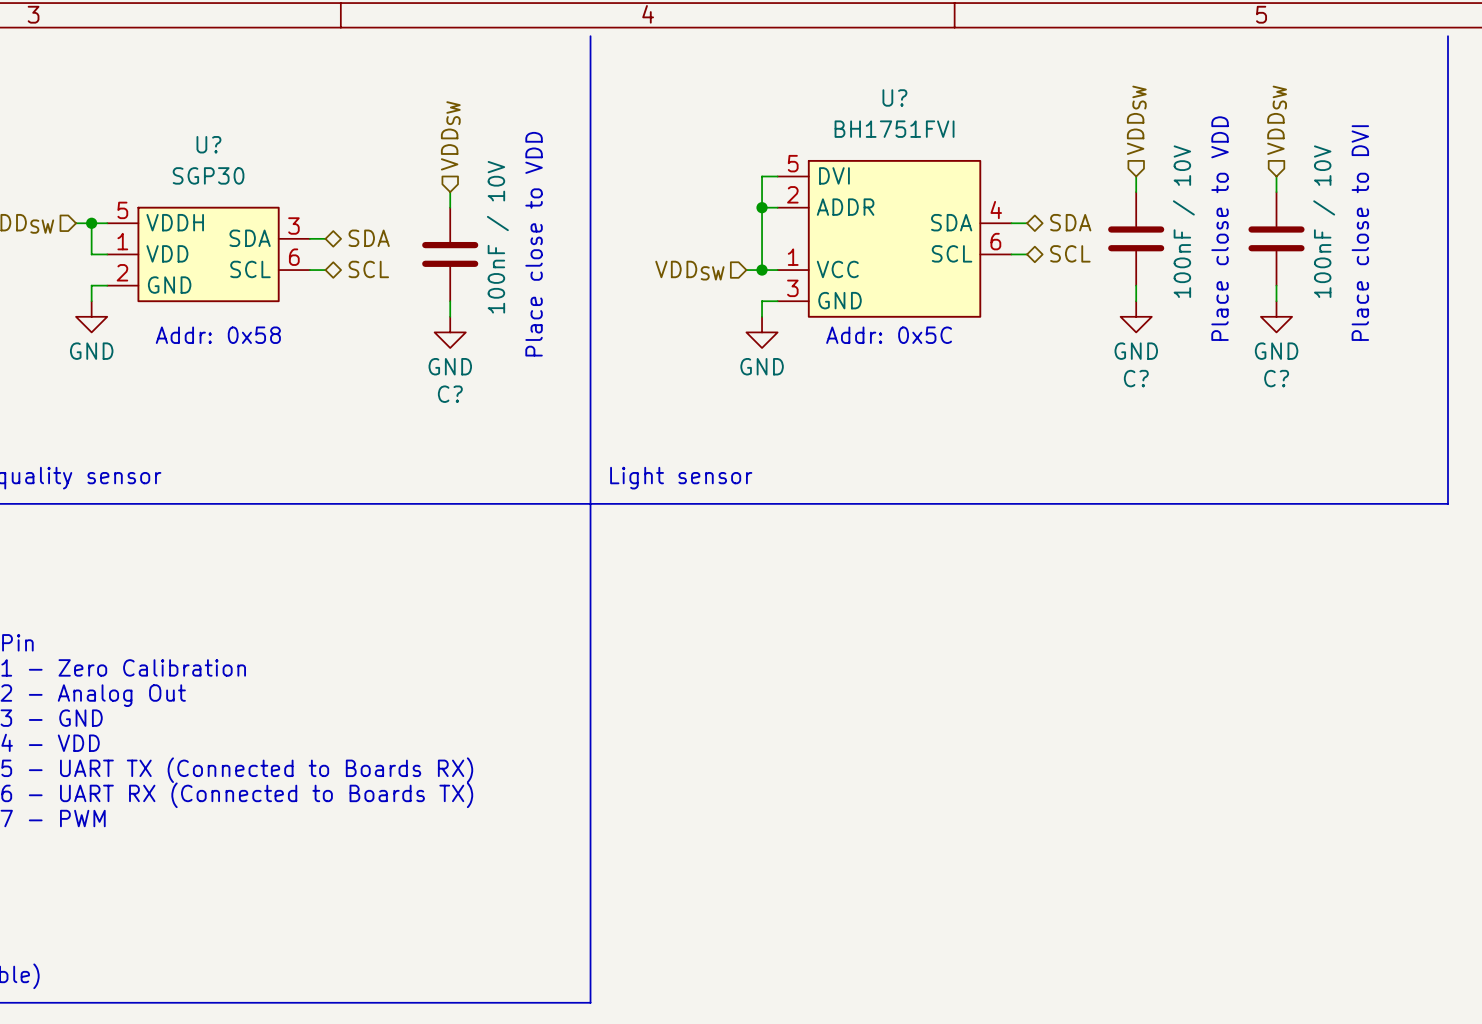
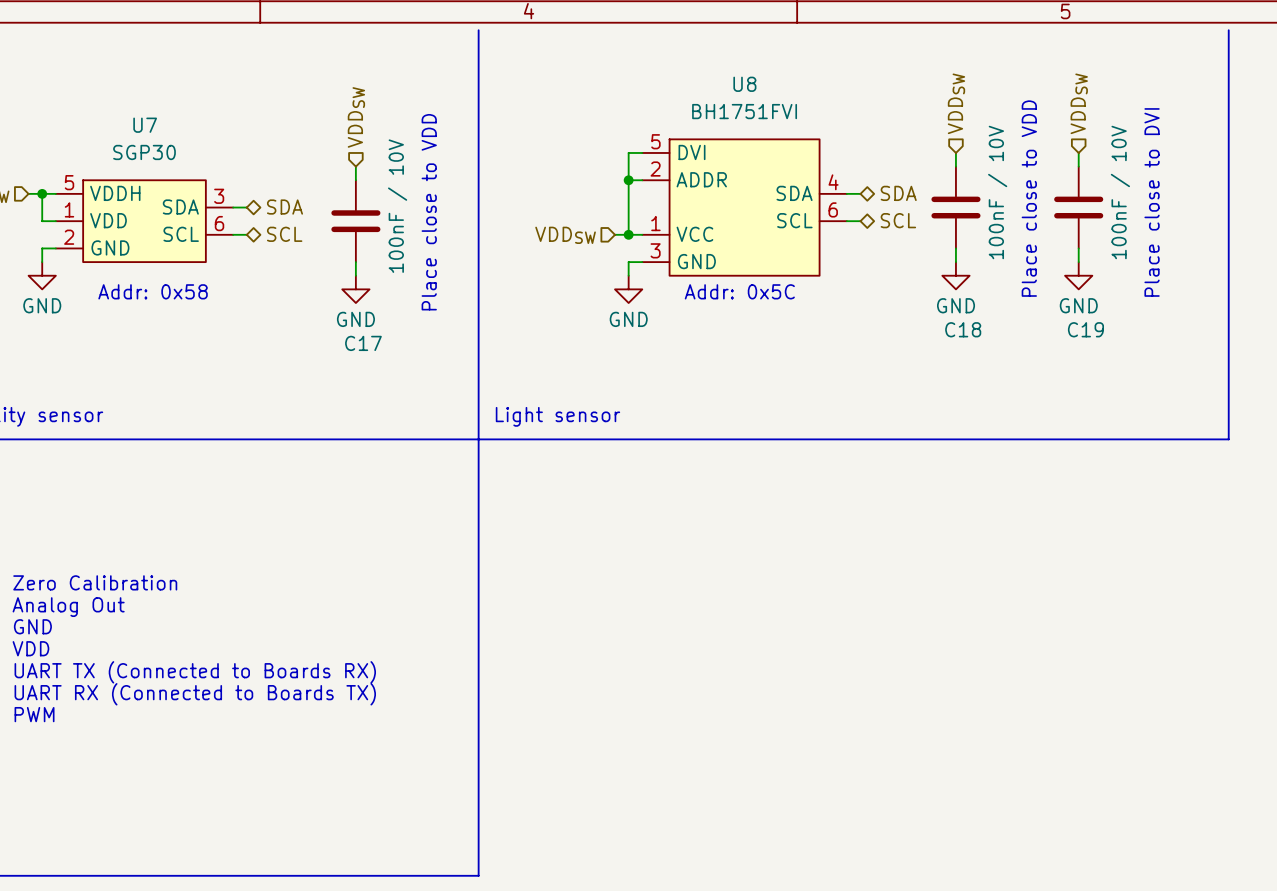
U? name: U? (894, 97) -> U8 (744, 84)
U? name: U? (208, 144) -> U7 (145, 125)
C? name: C? (1136, 378) -> C18 (963, 329)
C? name: C? (1276, 378) -> C19 (1085, 329)
C? name: C? (450, 394) -> C17 (363, 343)

